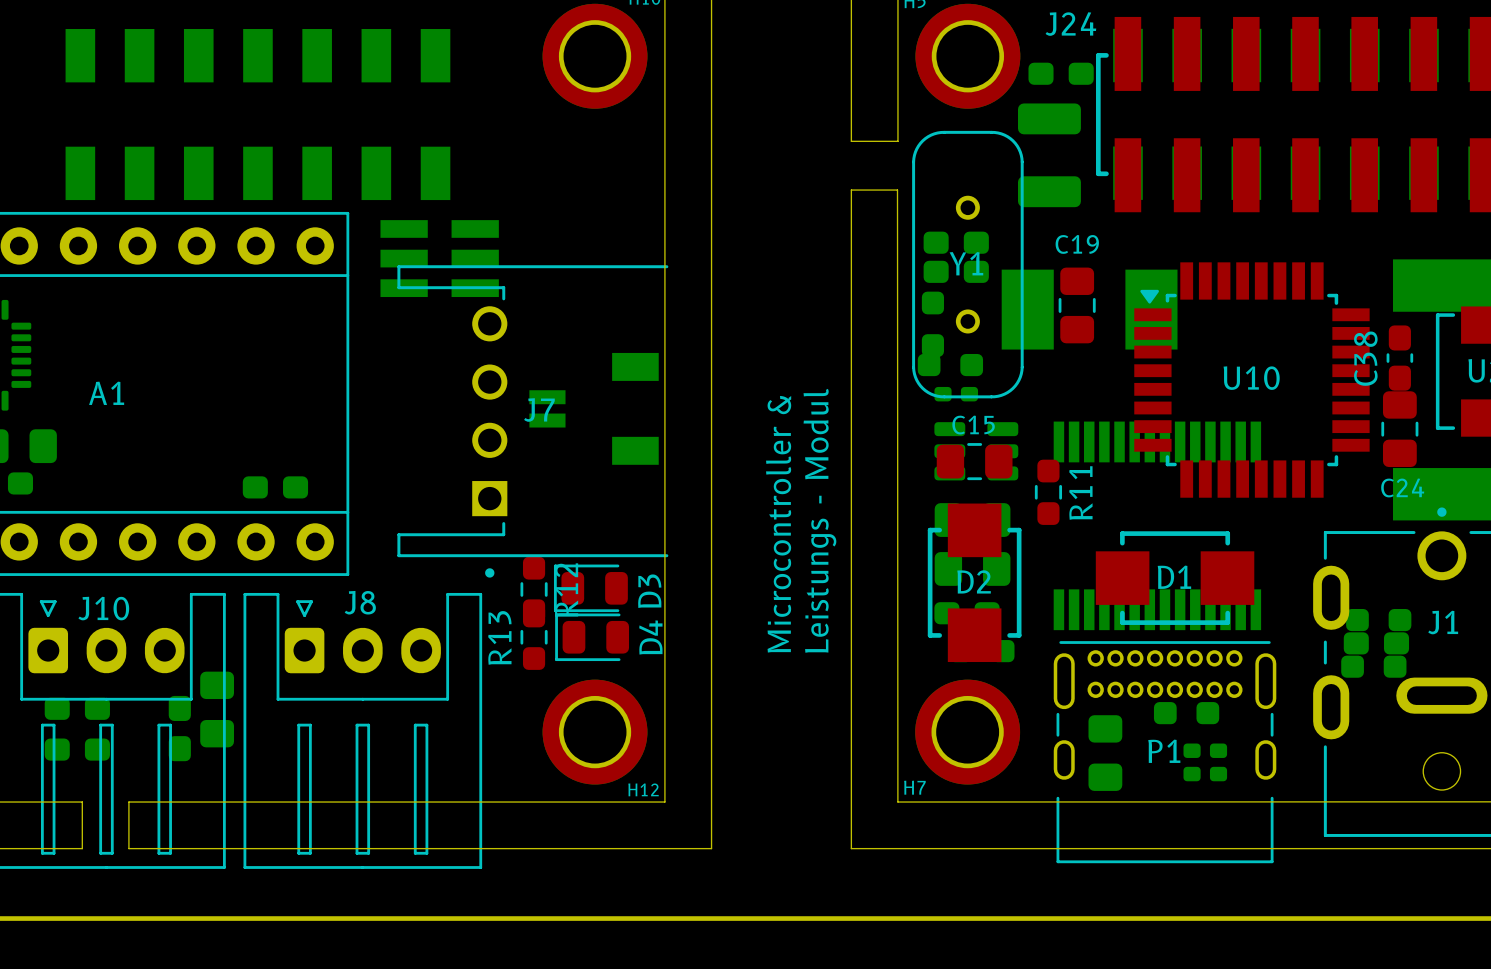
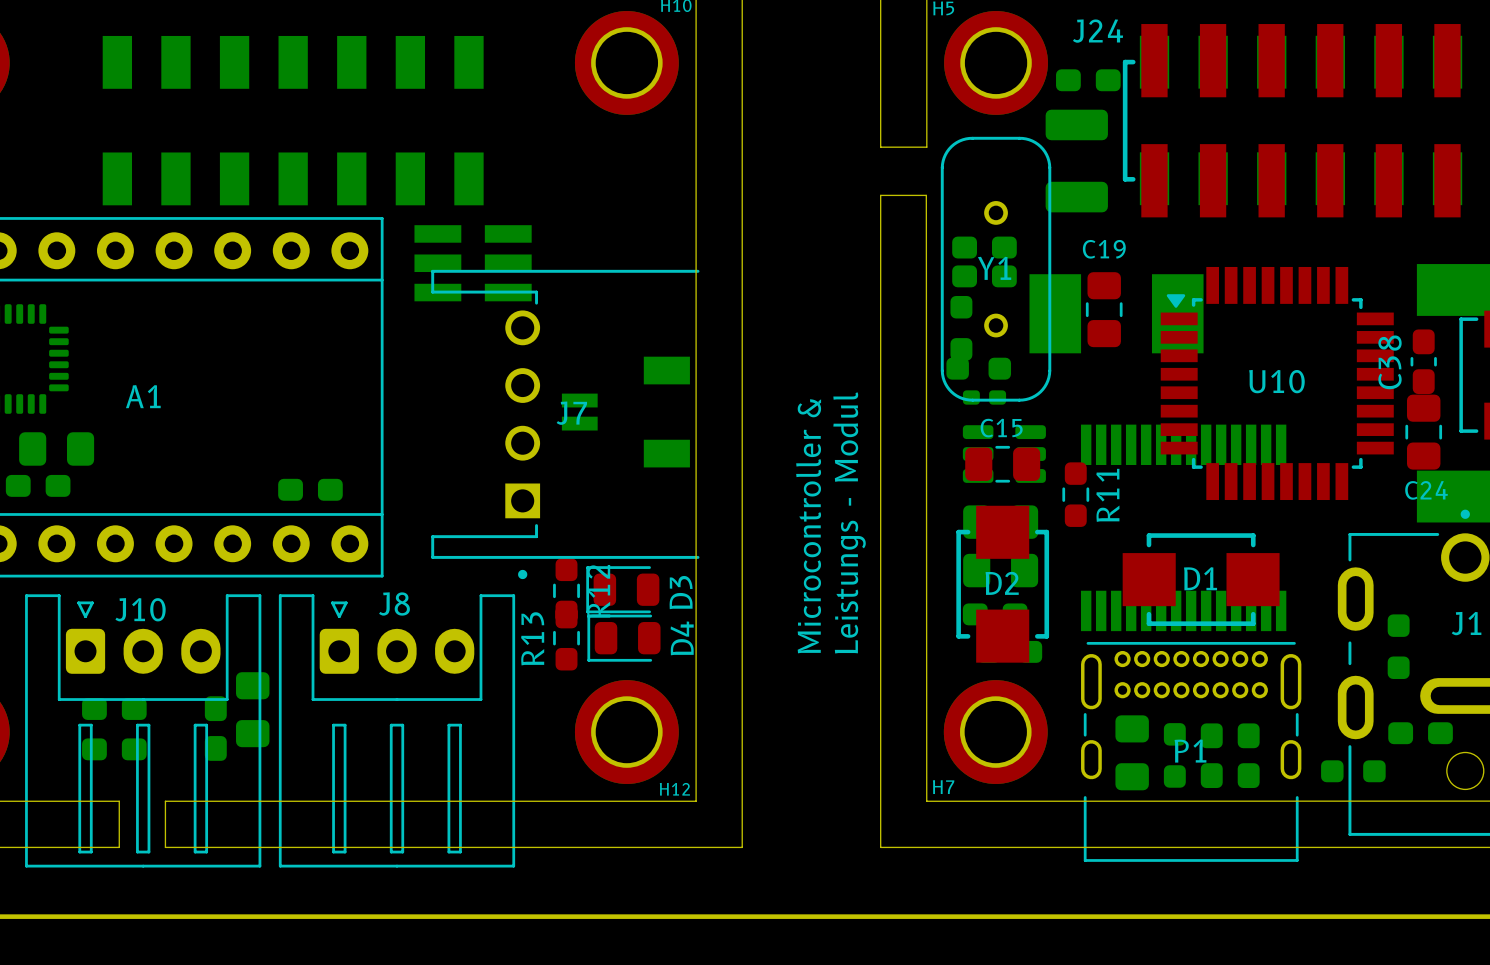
part: (1378, 620) -> none
part footprint: [1343, 632, 1410, 655] -> [1387, 614, 1410, 679]
part: (1373, 666) -> none
part rotation: 0° (1186, 713) -> 90° clockwise (1174, 755)
part position: (1186, 713) -> (1174, 755)
part: none -> (1420, 733)
part: (1205, 750) -> none
part: none -> (1211, 755)
part: none -> (1248, 755)
part: none -> (1353, 771)
part: (1205, 774) -> none

